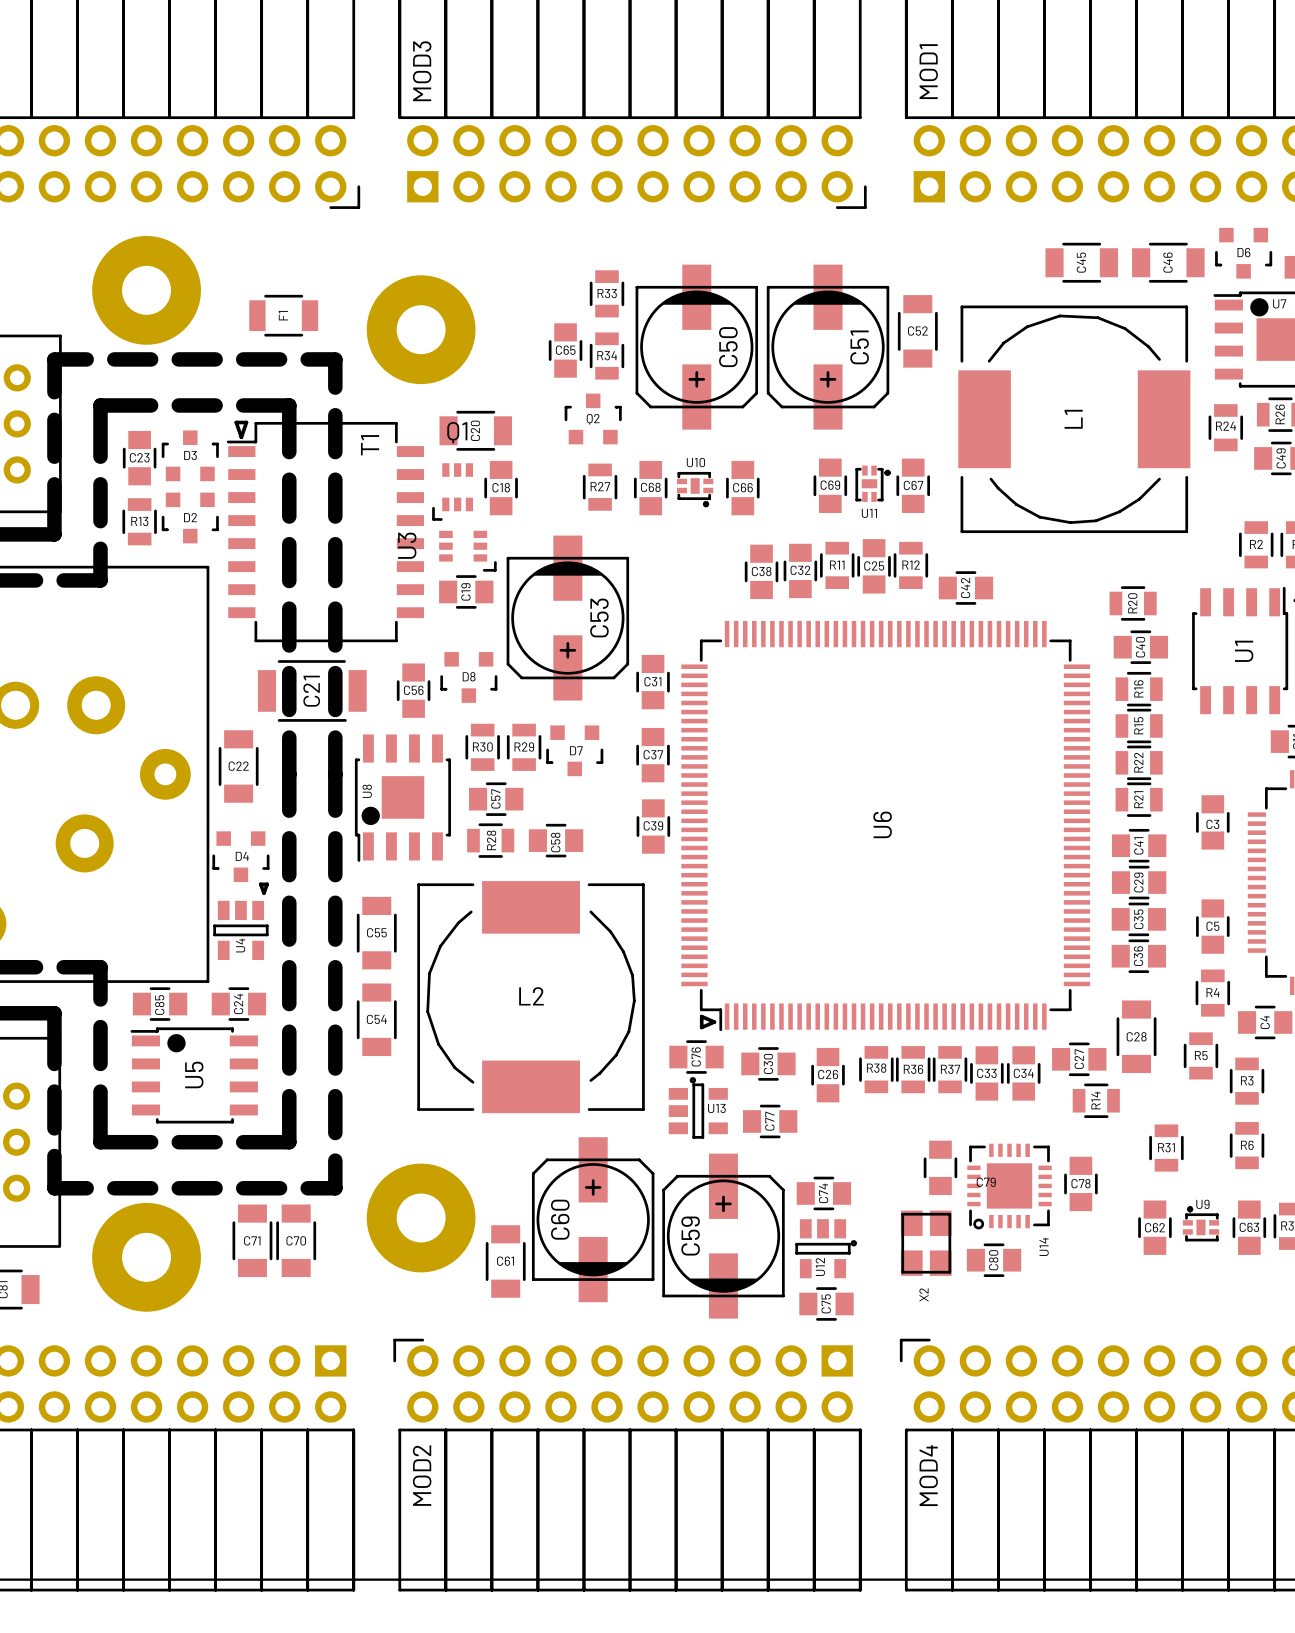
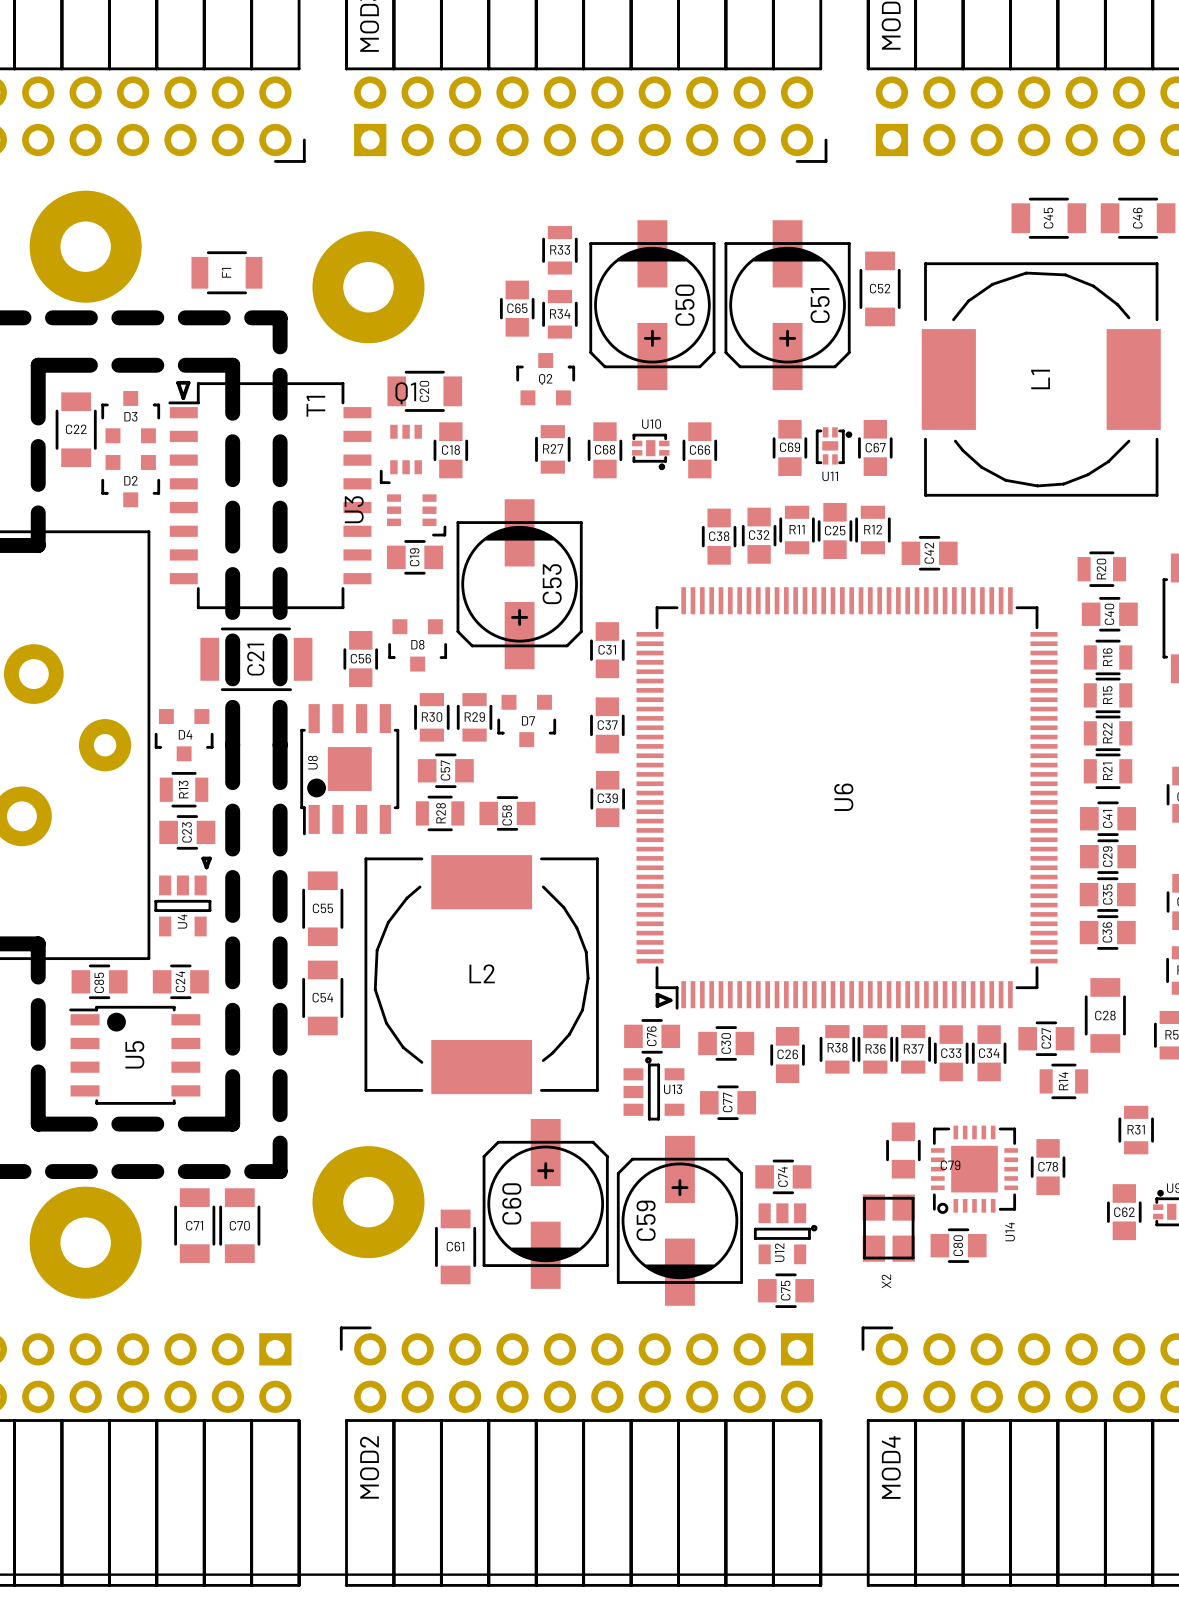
C23 rotation: 0° (139, 458) -> 90° clockwise (187, 832)
C23 position: (139, 458) -> (187, 832)
R13 rotation: 0° (139, 521) -> 90° clockwise (184, 789)
R13 position: (139, 521) -> (184, 789)
C22 position: (238, 766) -> (76, 429)
D4 position: (240, 856) -> (184, 735)

